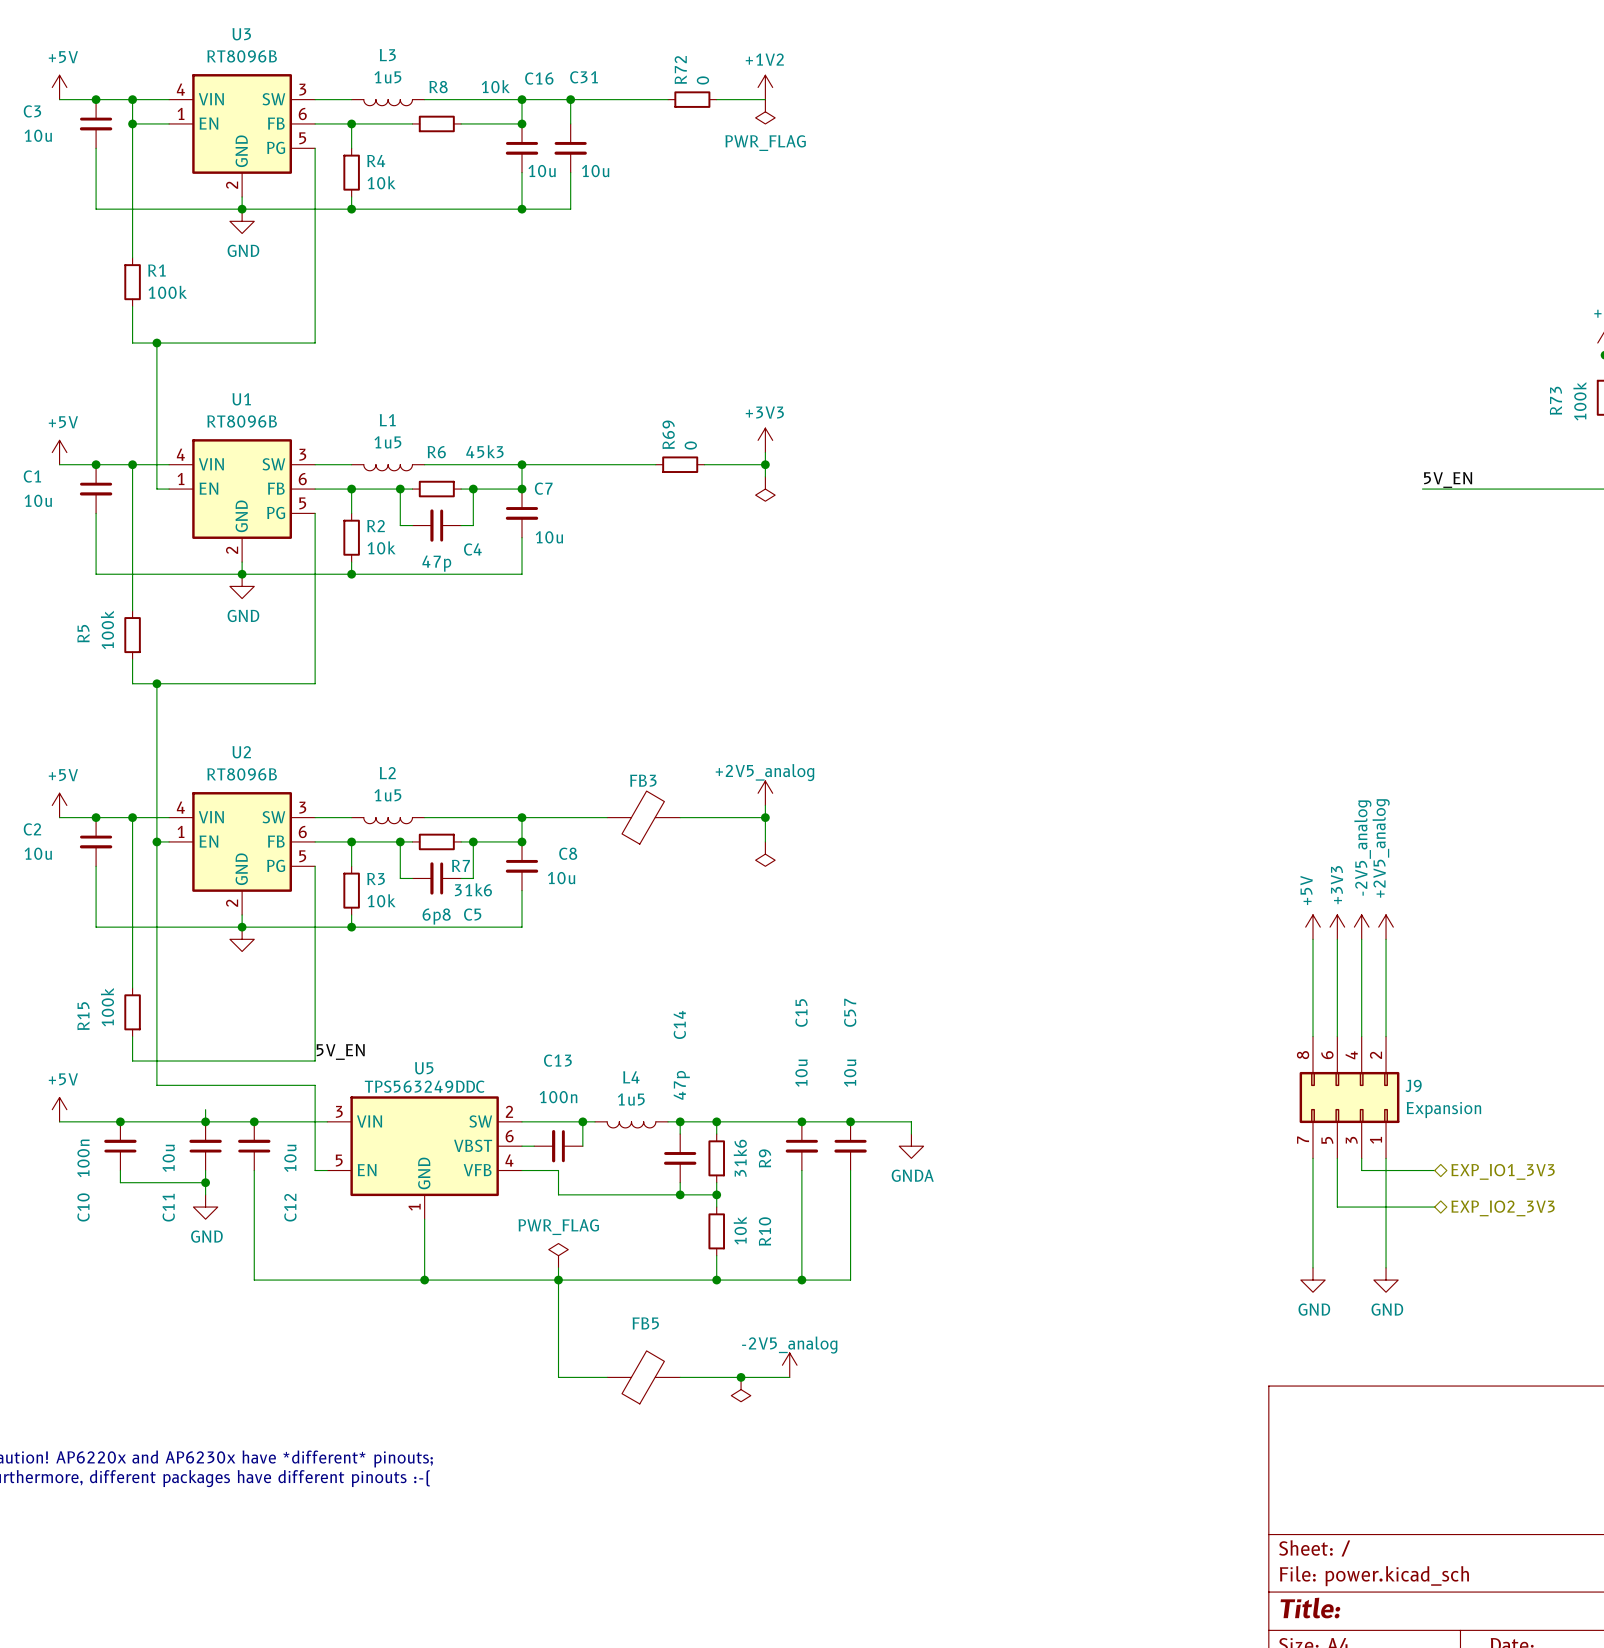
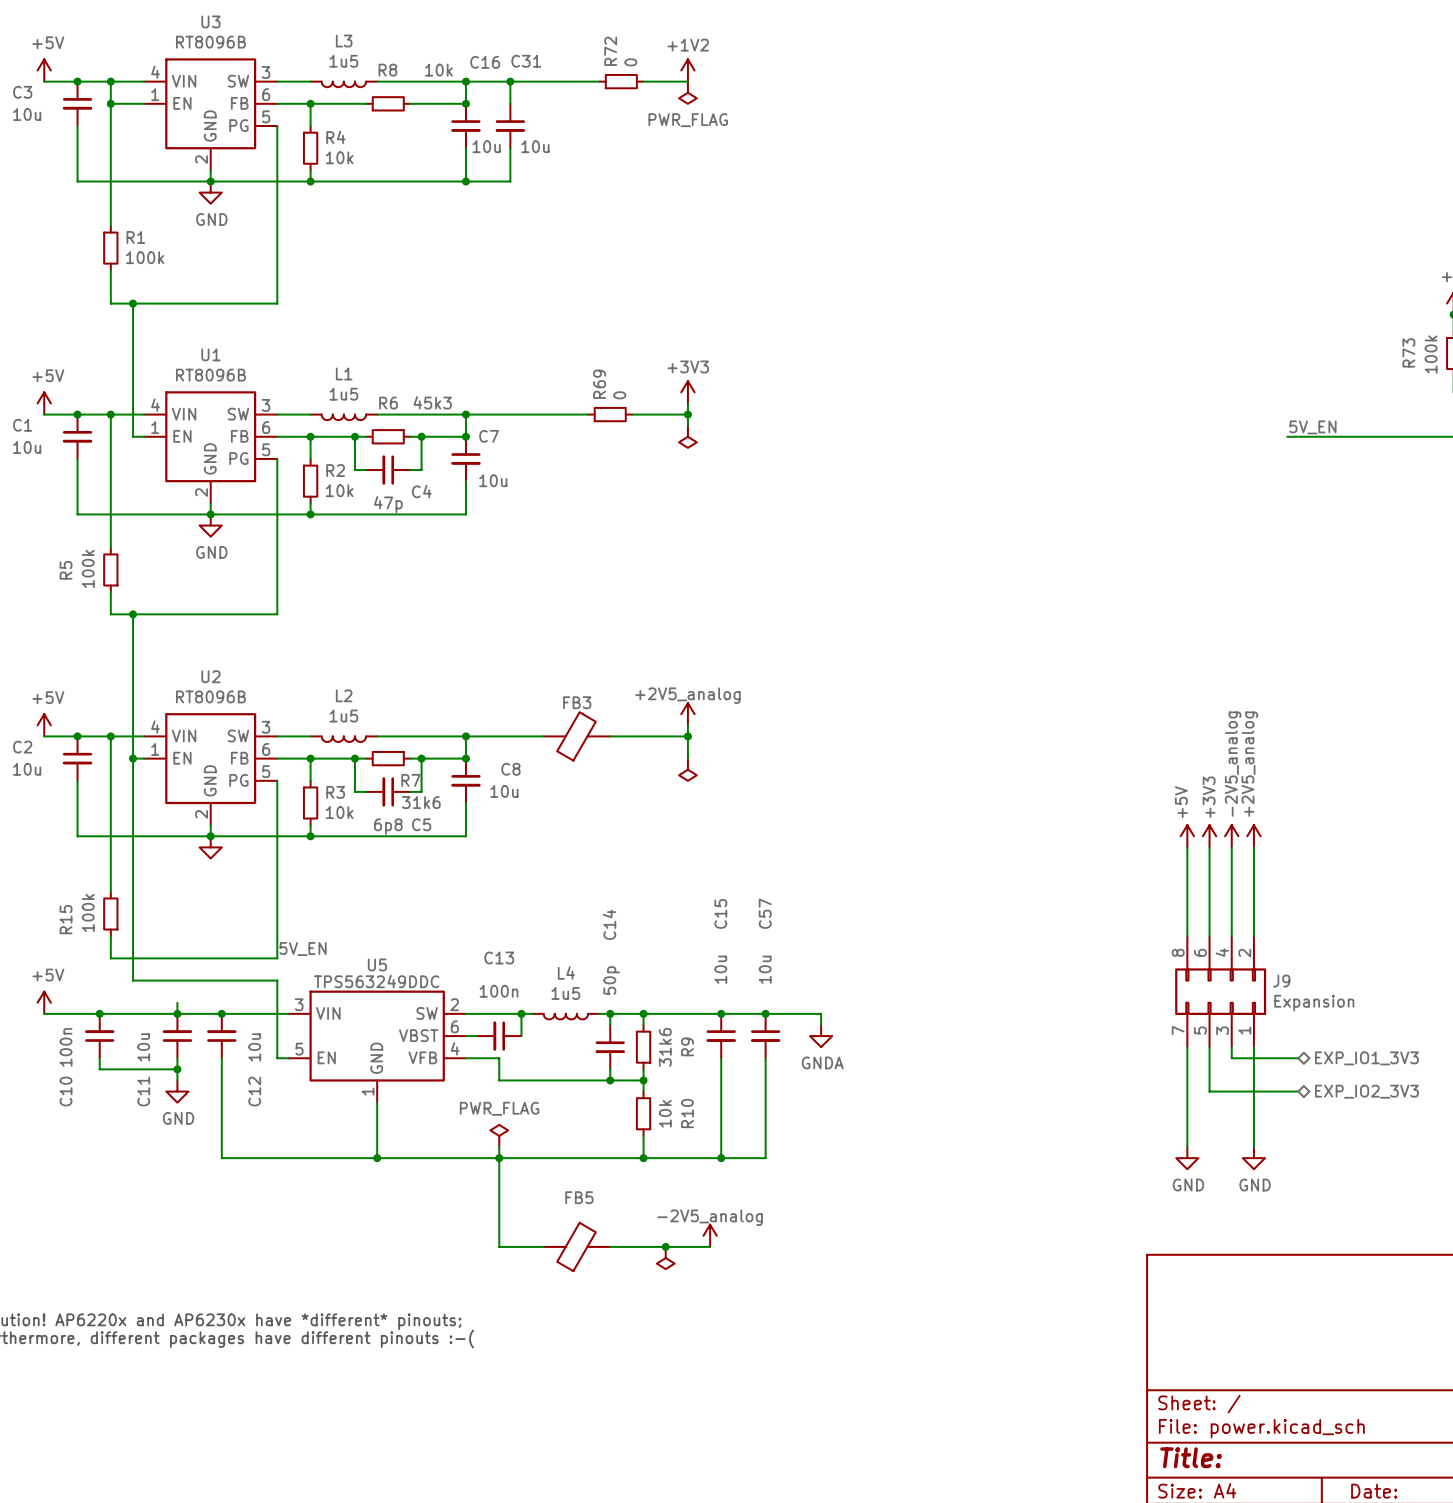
C14 value: 47p (681, 1085) -> 50p (611, 980)

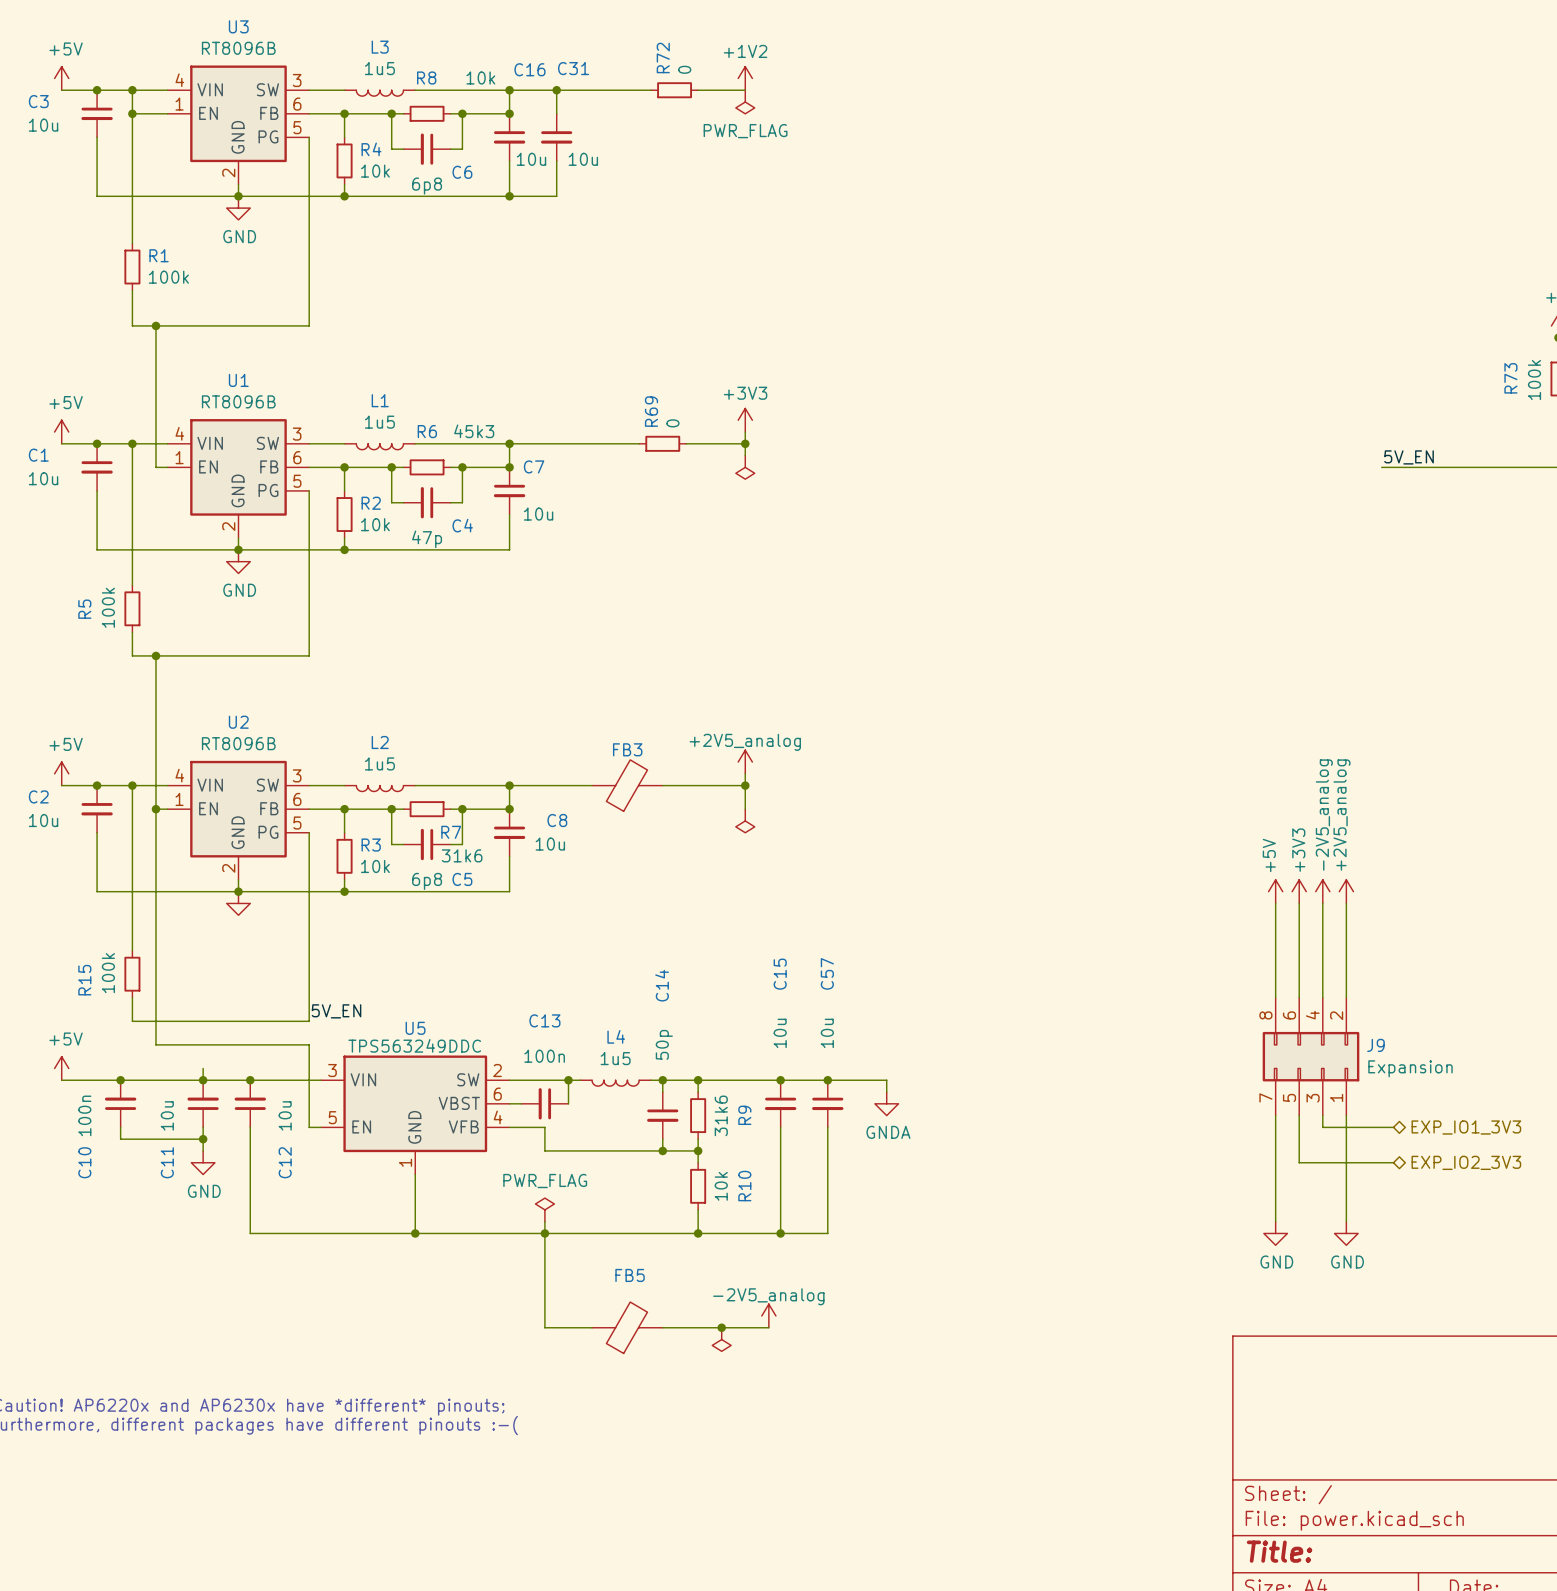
wire: none -> (391, 113) (391, 149) (403, 149)
junction: none -> (391, 113)
wire: none -> (462, 113) (462, 149) (450, 149)
junction: none -> (462, 113)
C6: none -> 6p8 (427, 149)

